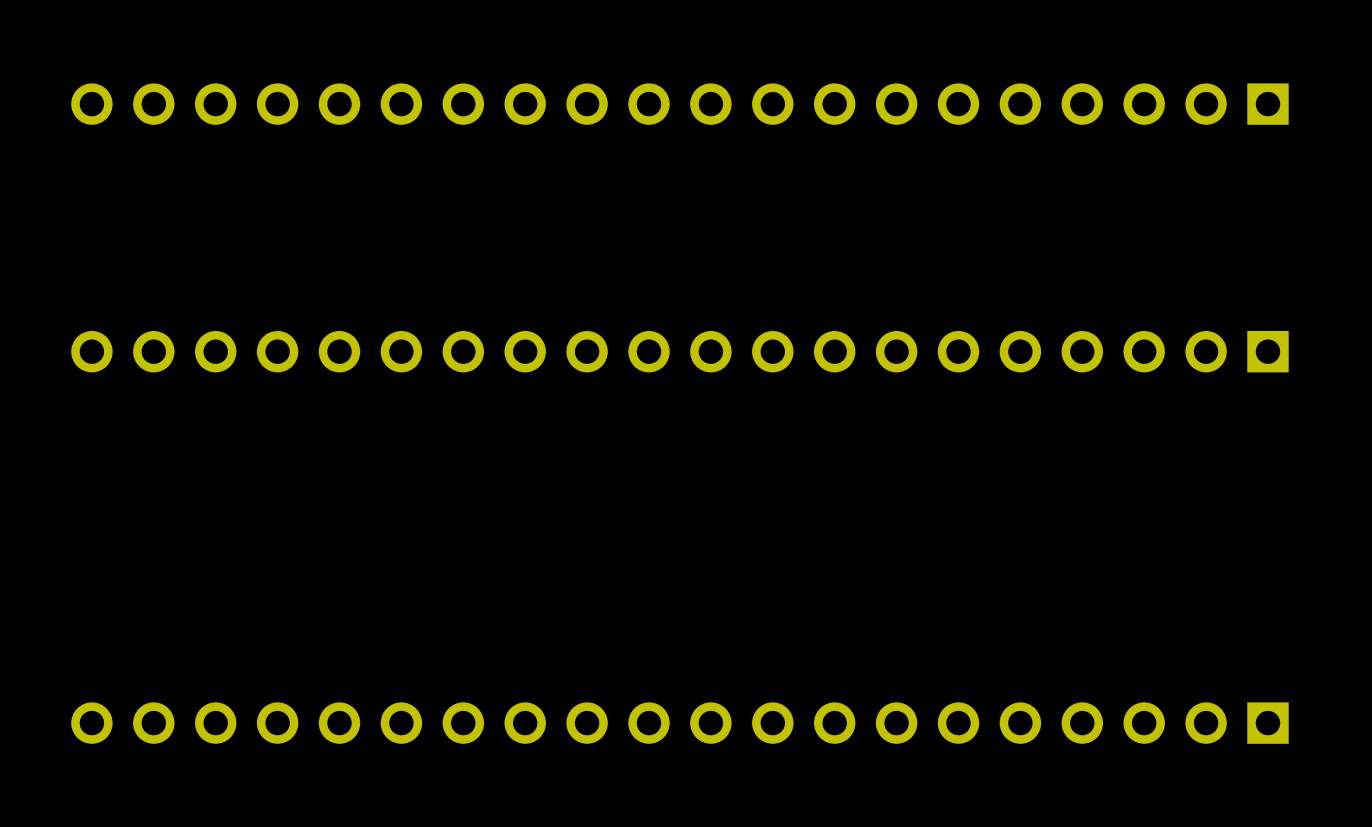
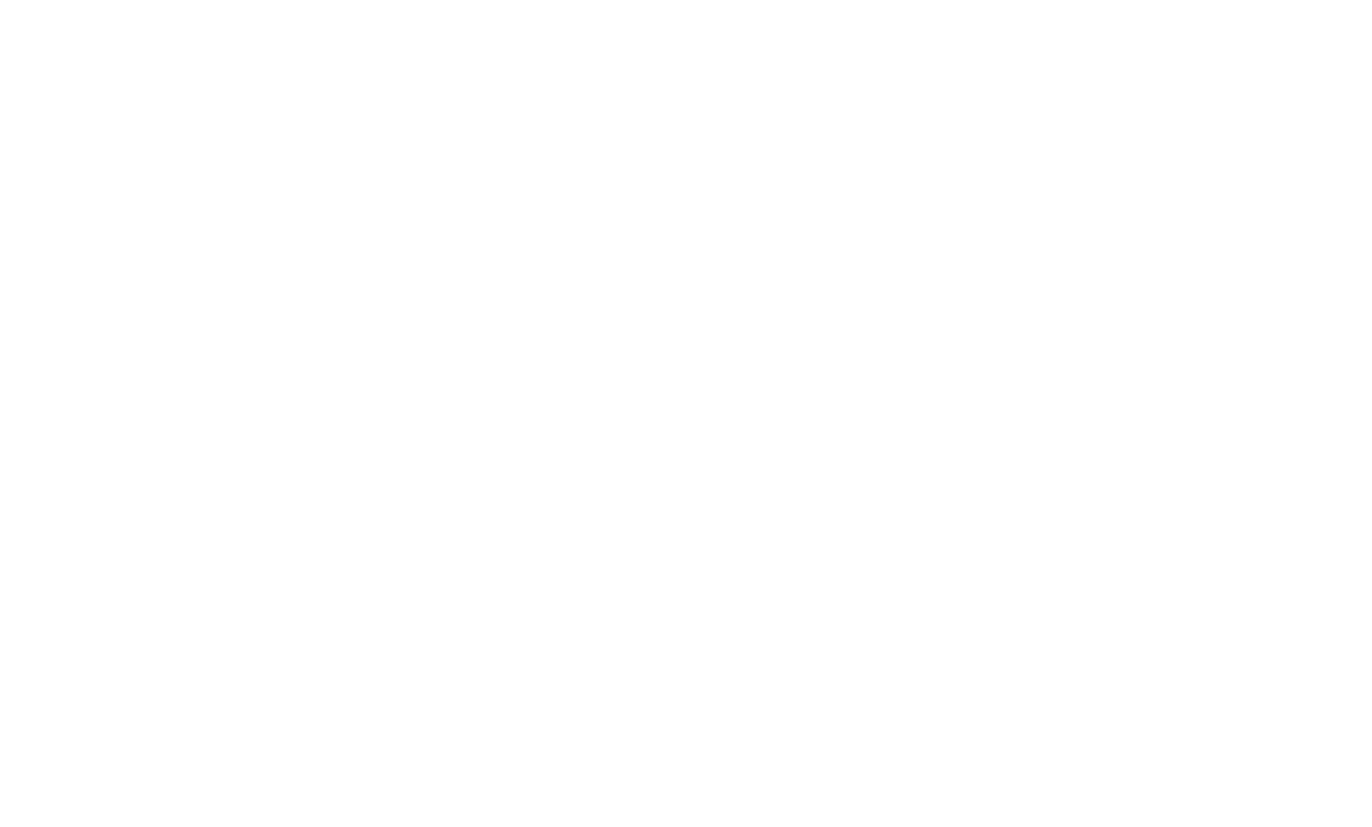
part: (679, 104) -> none
part: (679, 351) -> none
part: (679, 723) -> none

